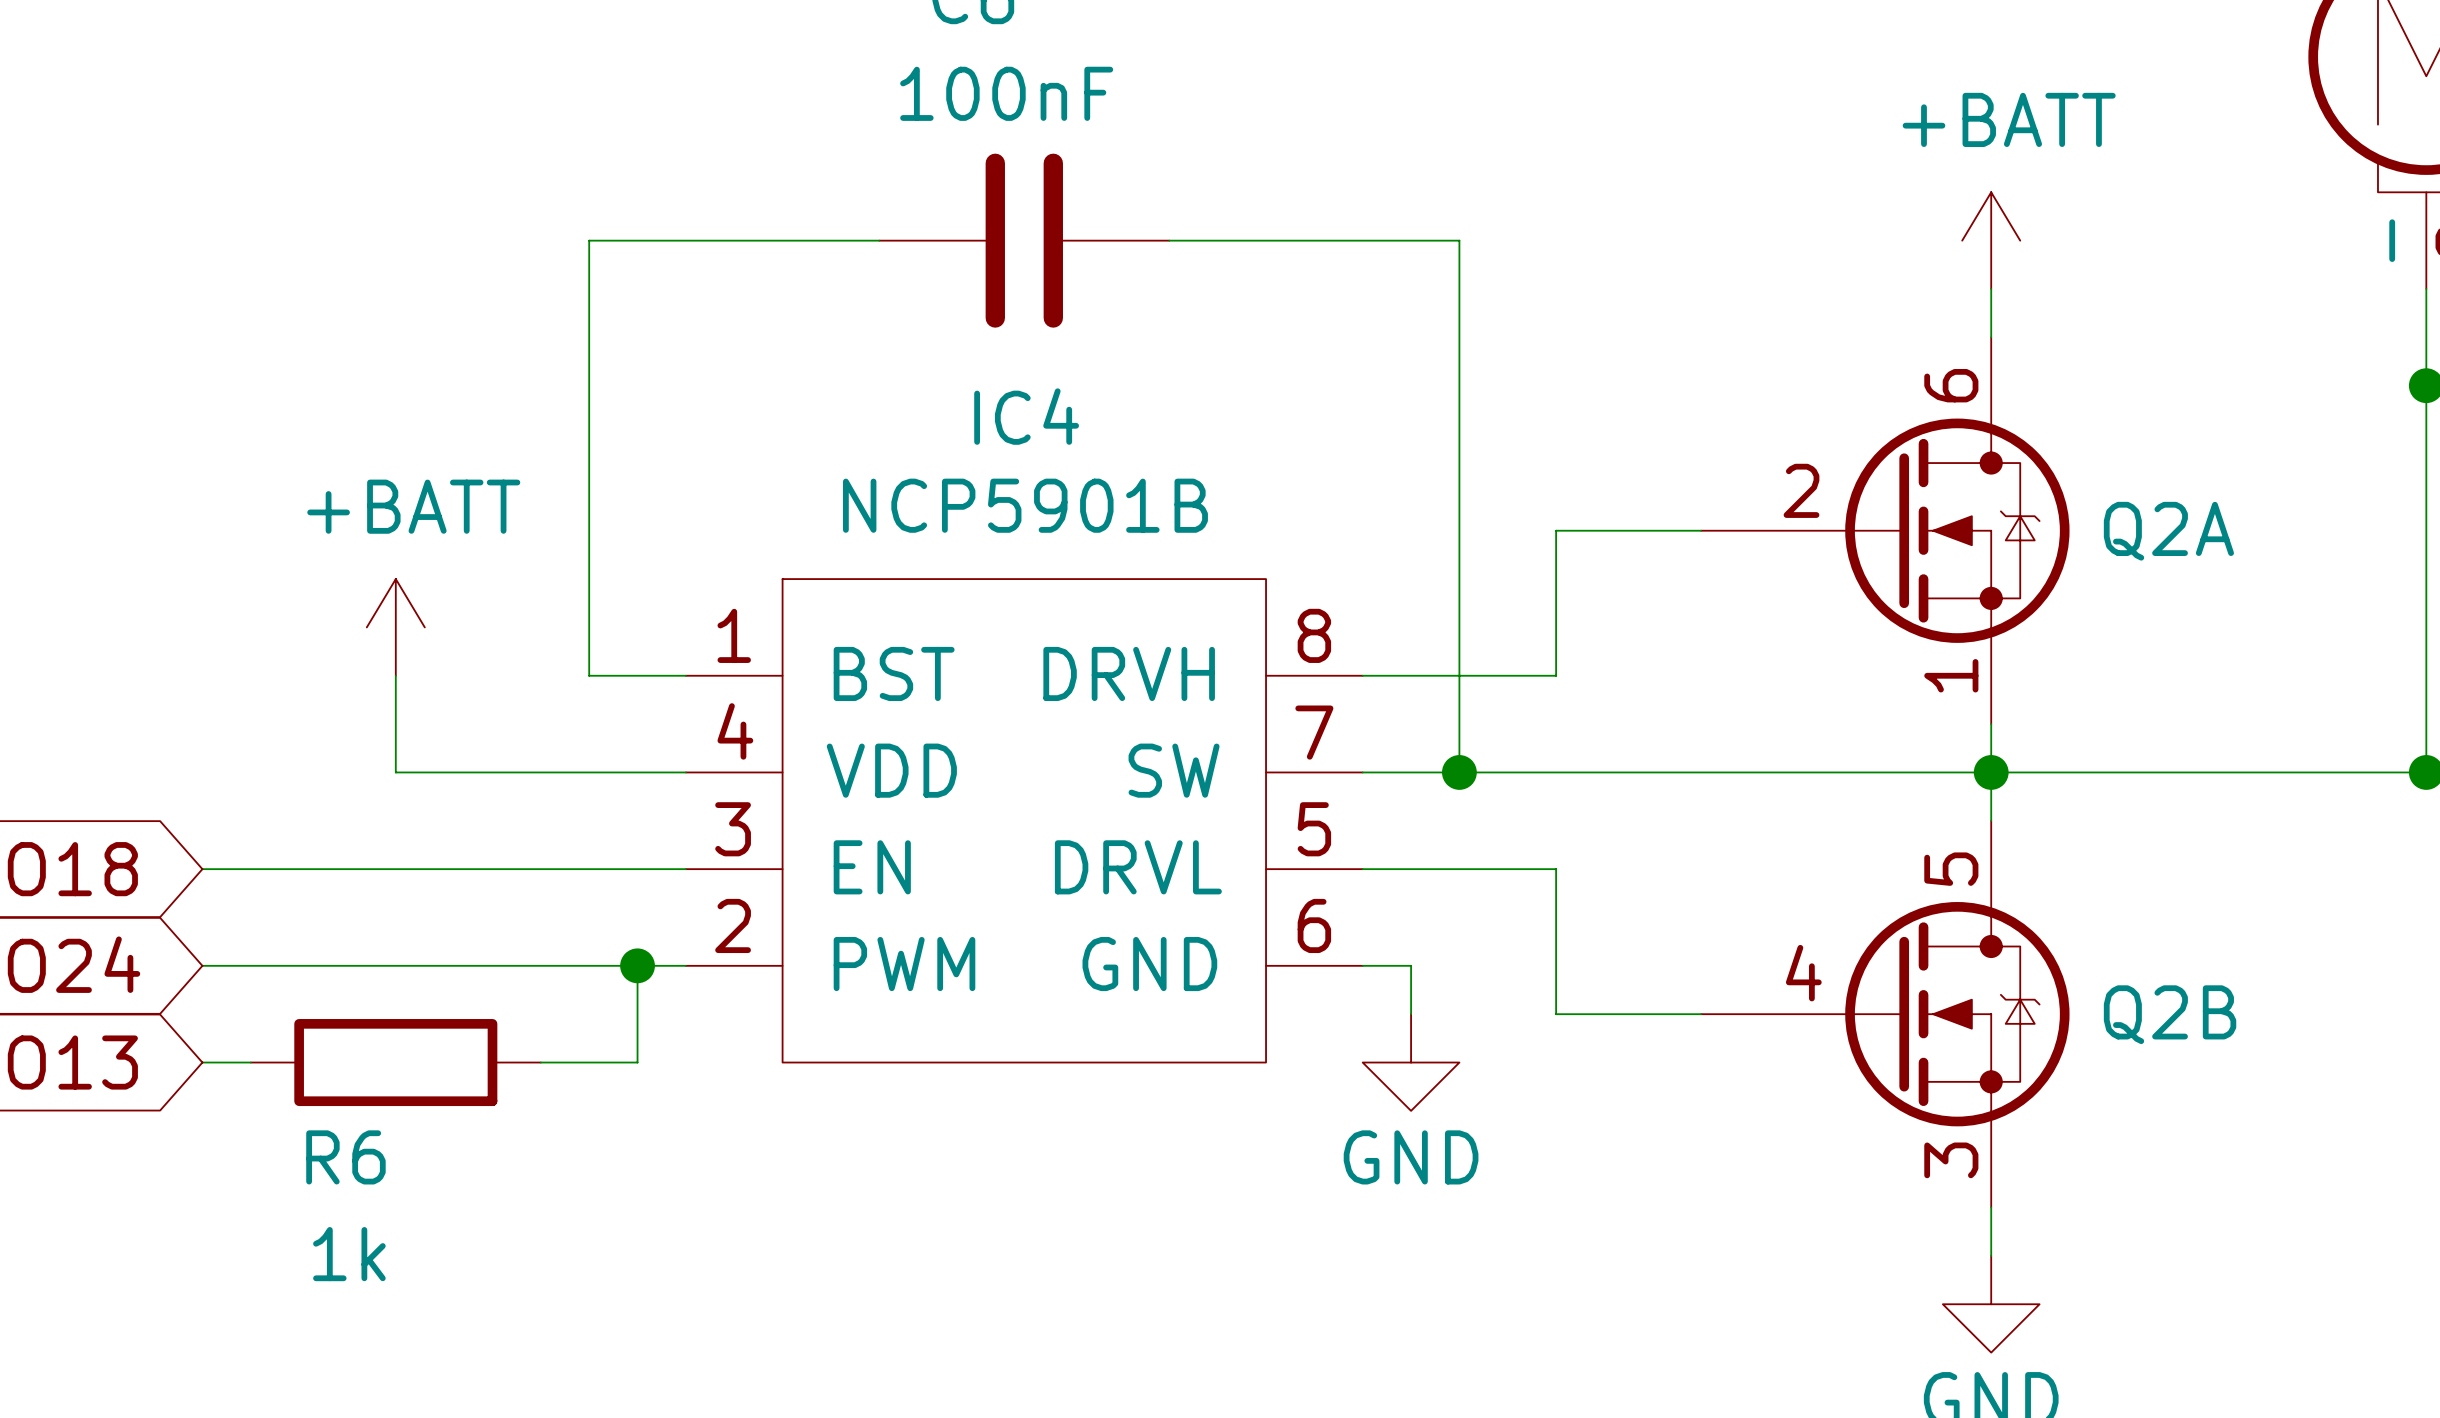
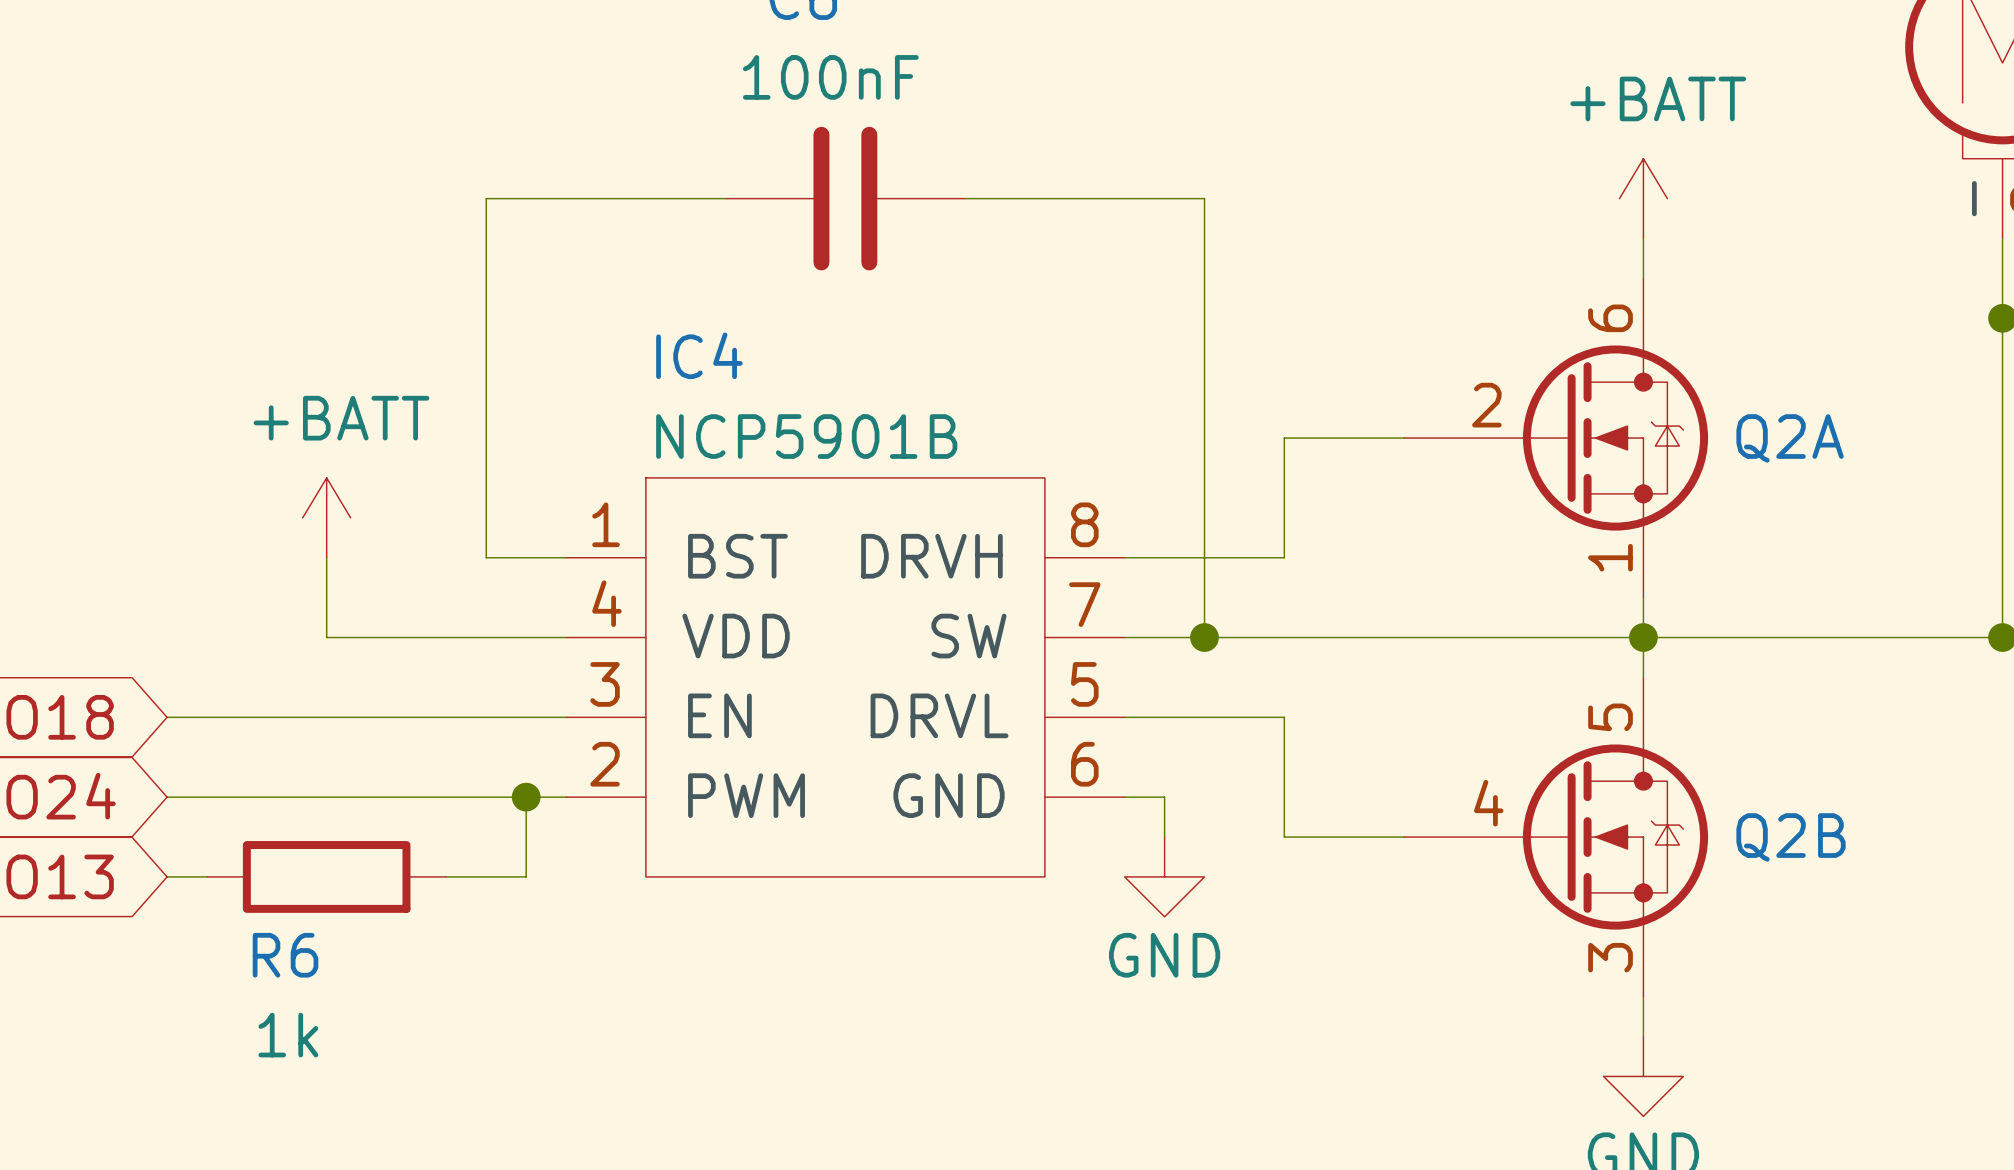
IC4 name position: IC4 (1026, 416) -> IC4 (699, 355)
IC4 value position: NCP5901B (1025, 505) -> NCP5901B (806, 436)

